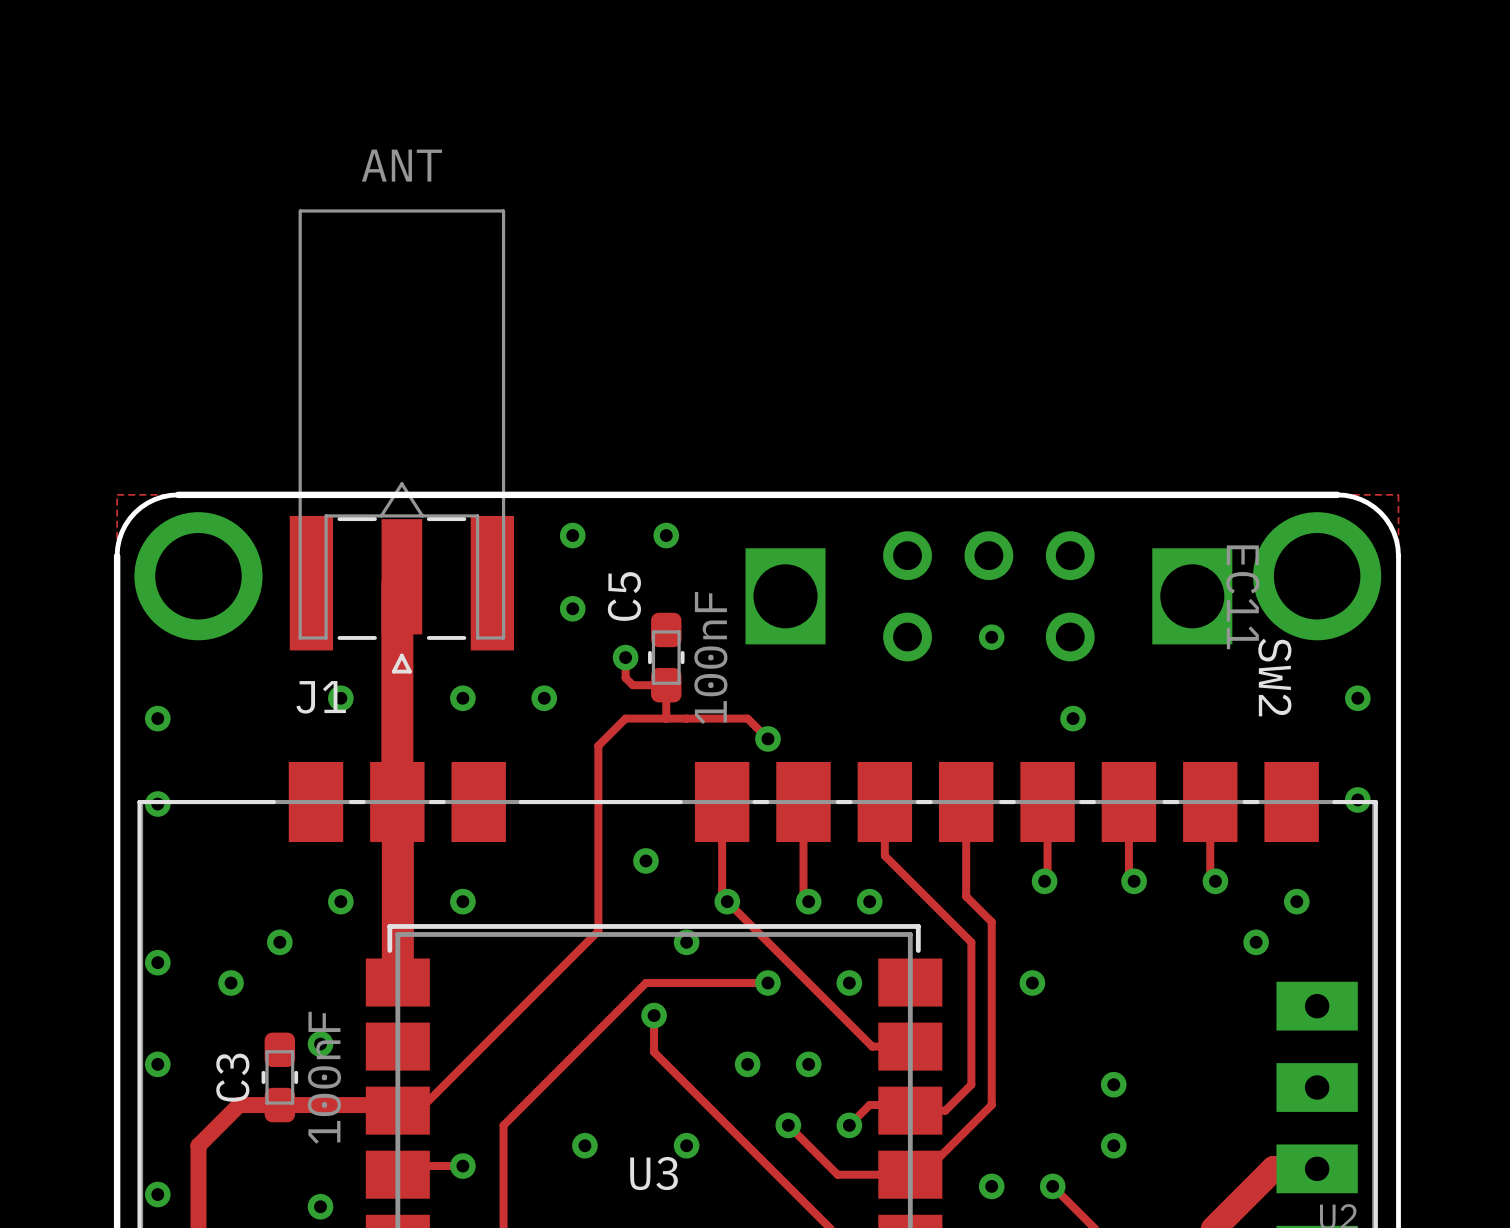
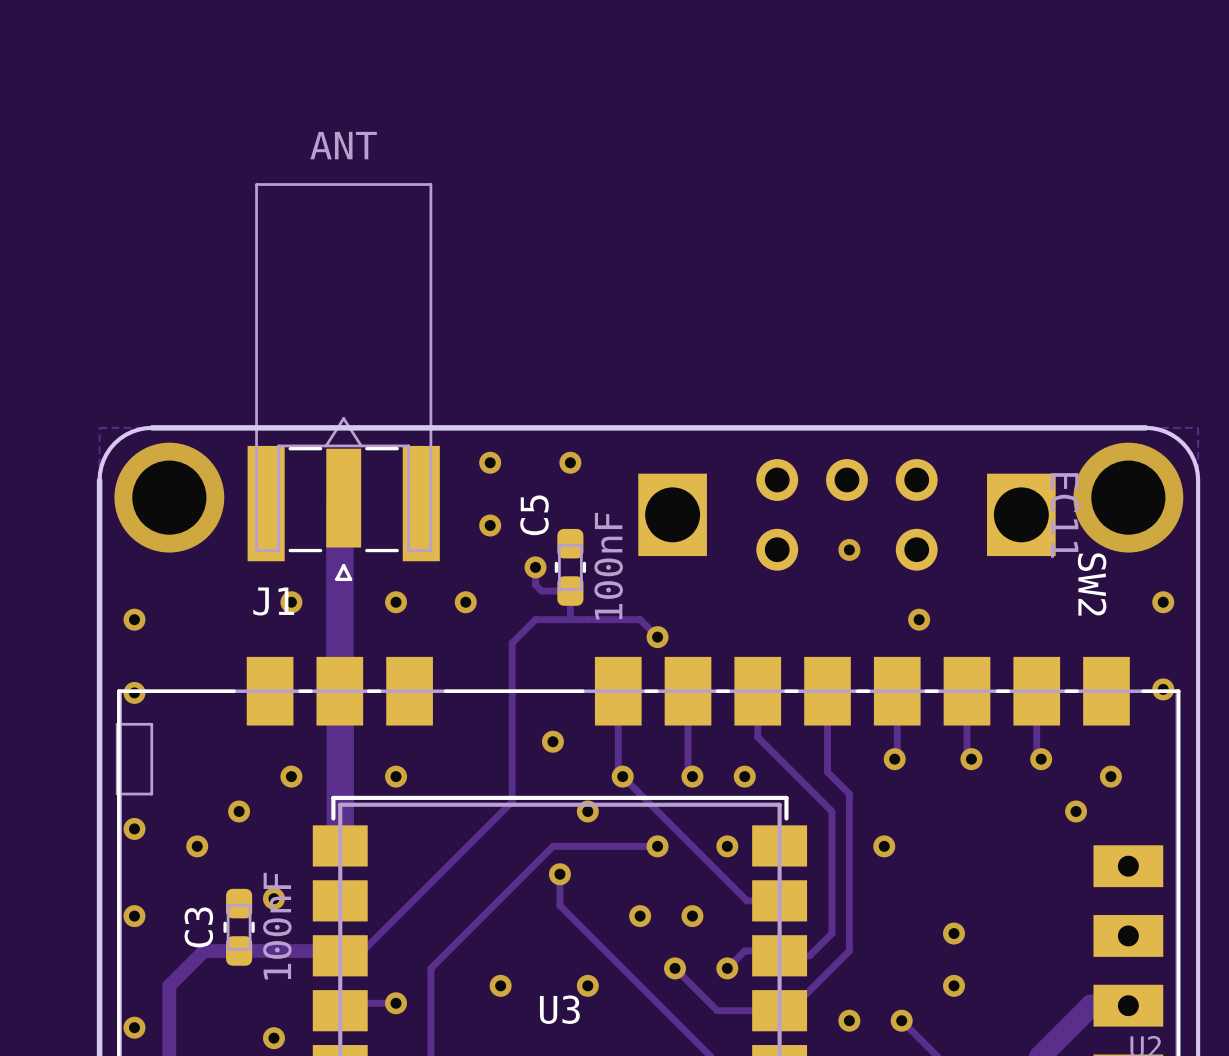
part: none -> (134, 759)

